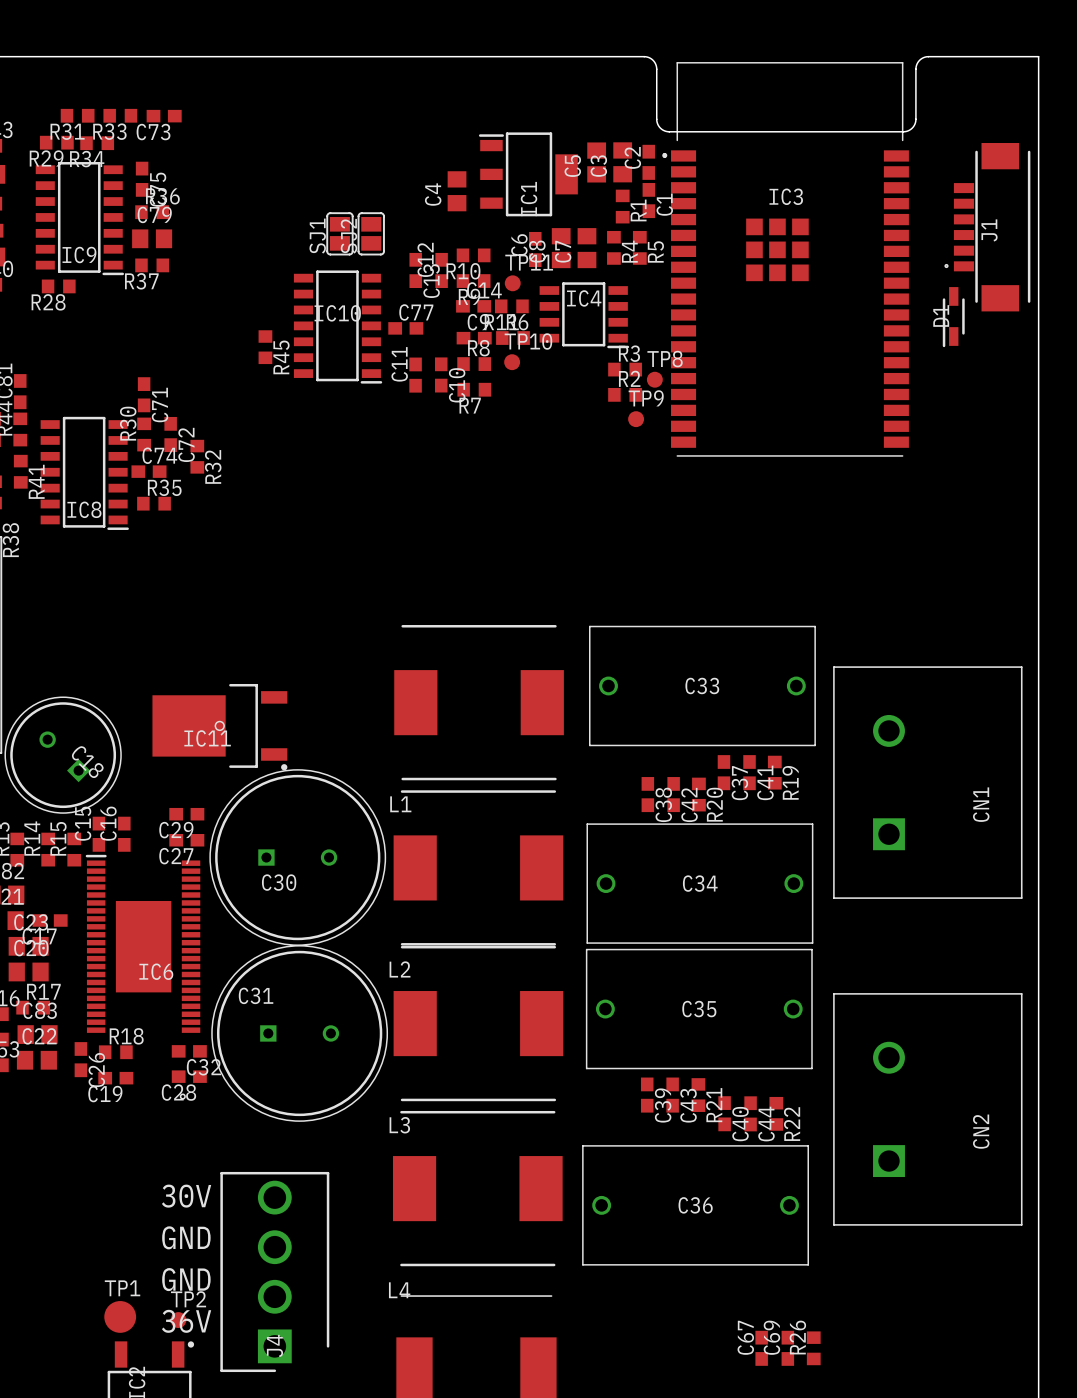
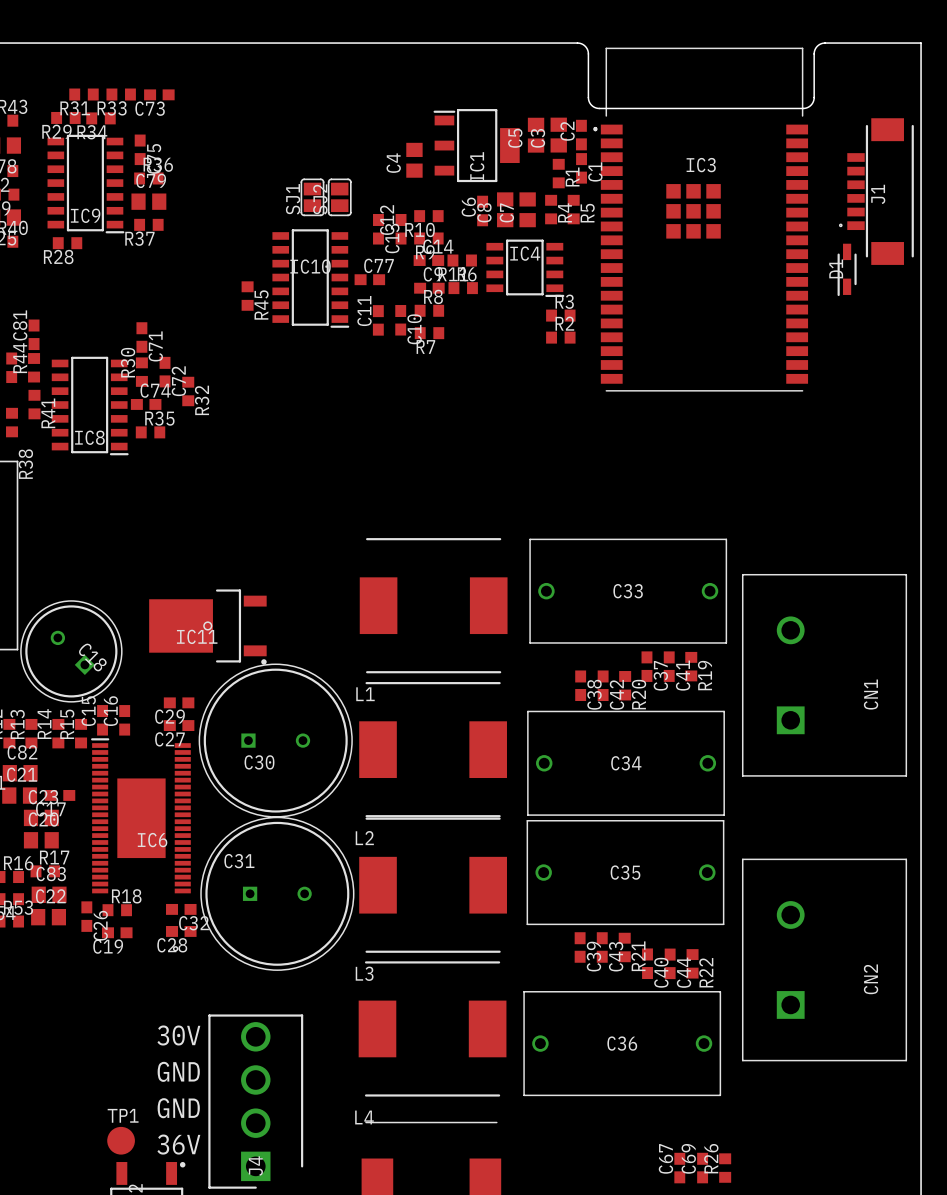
TP11: (512, 283) -> none
TP10: (512, 362) -> none
TP8: (654, 379) -> none
TP9: (636, 419) -> none
TP2: (178, 1320) -> none

